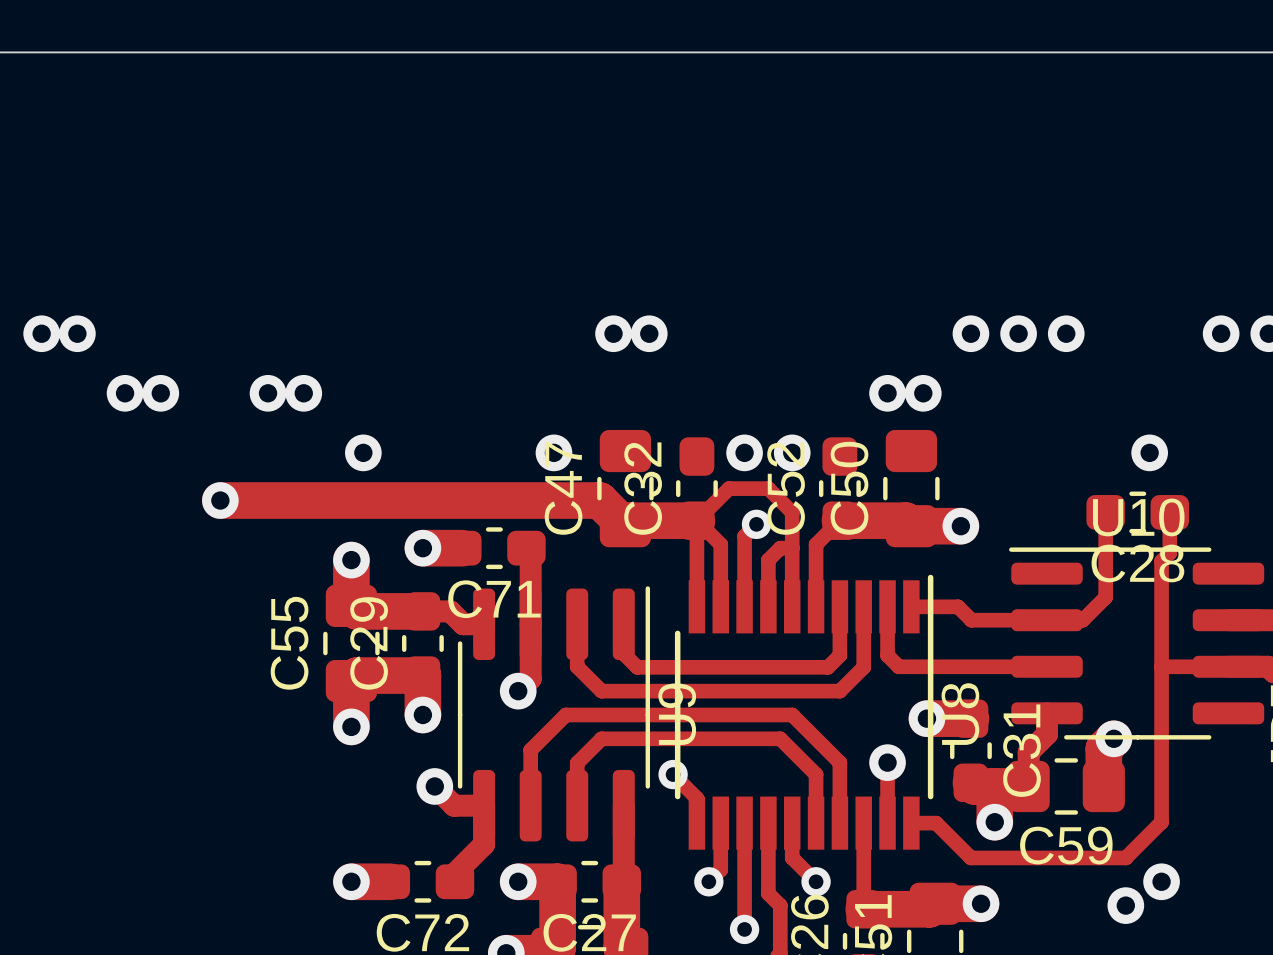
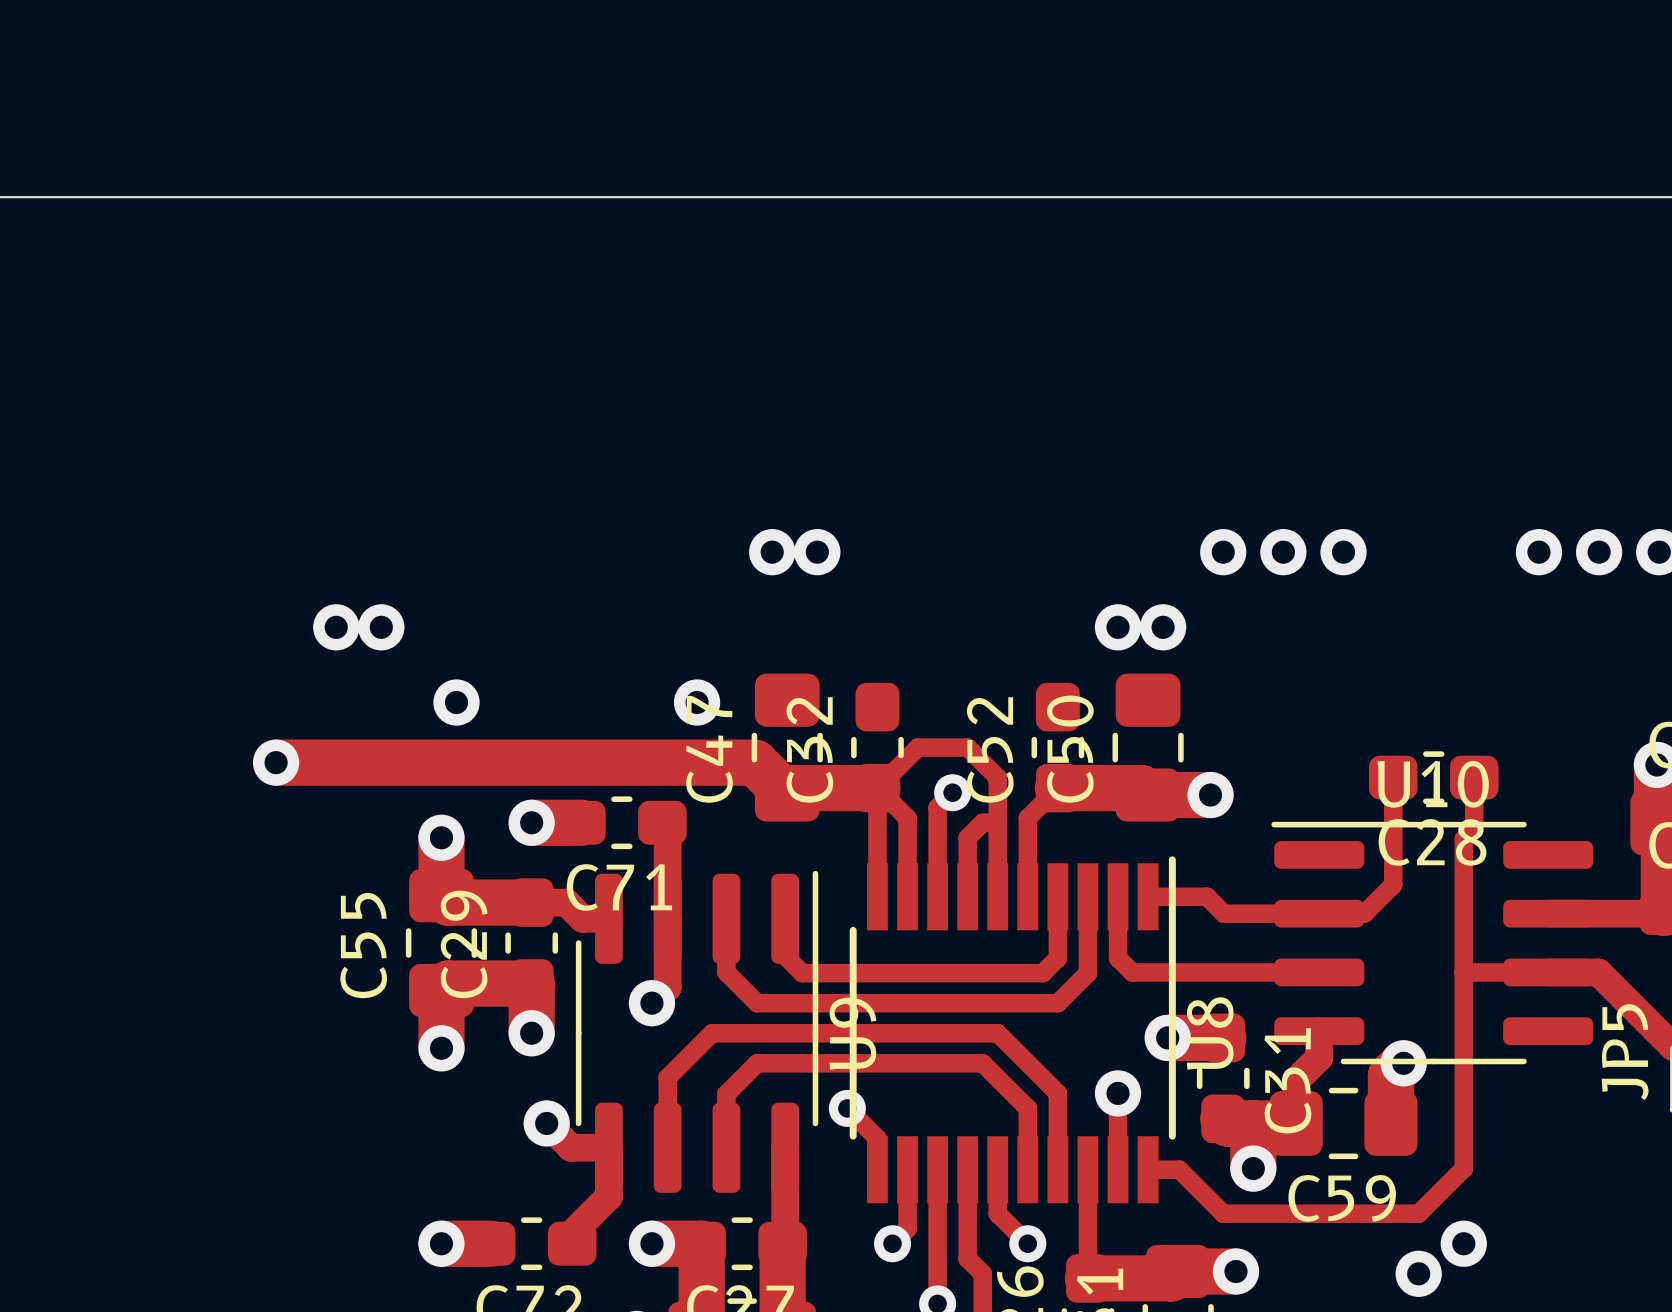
via: (41, 333) -> none
via: (77, 333) -> none
via: (125, 393) -> none
via: (160, 393) -> none
via: (744, 452) -> none
via: (792, 452) -> none
via: (1149, 452) -> none

